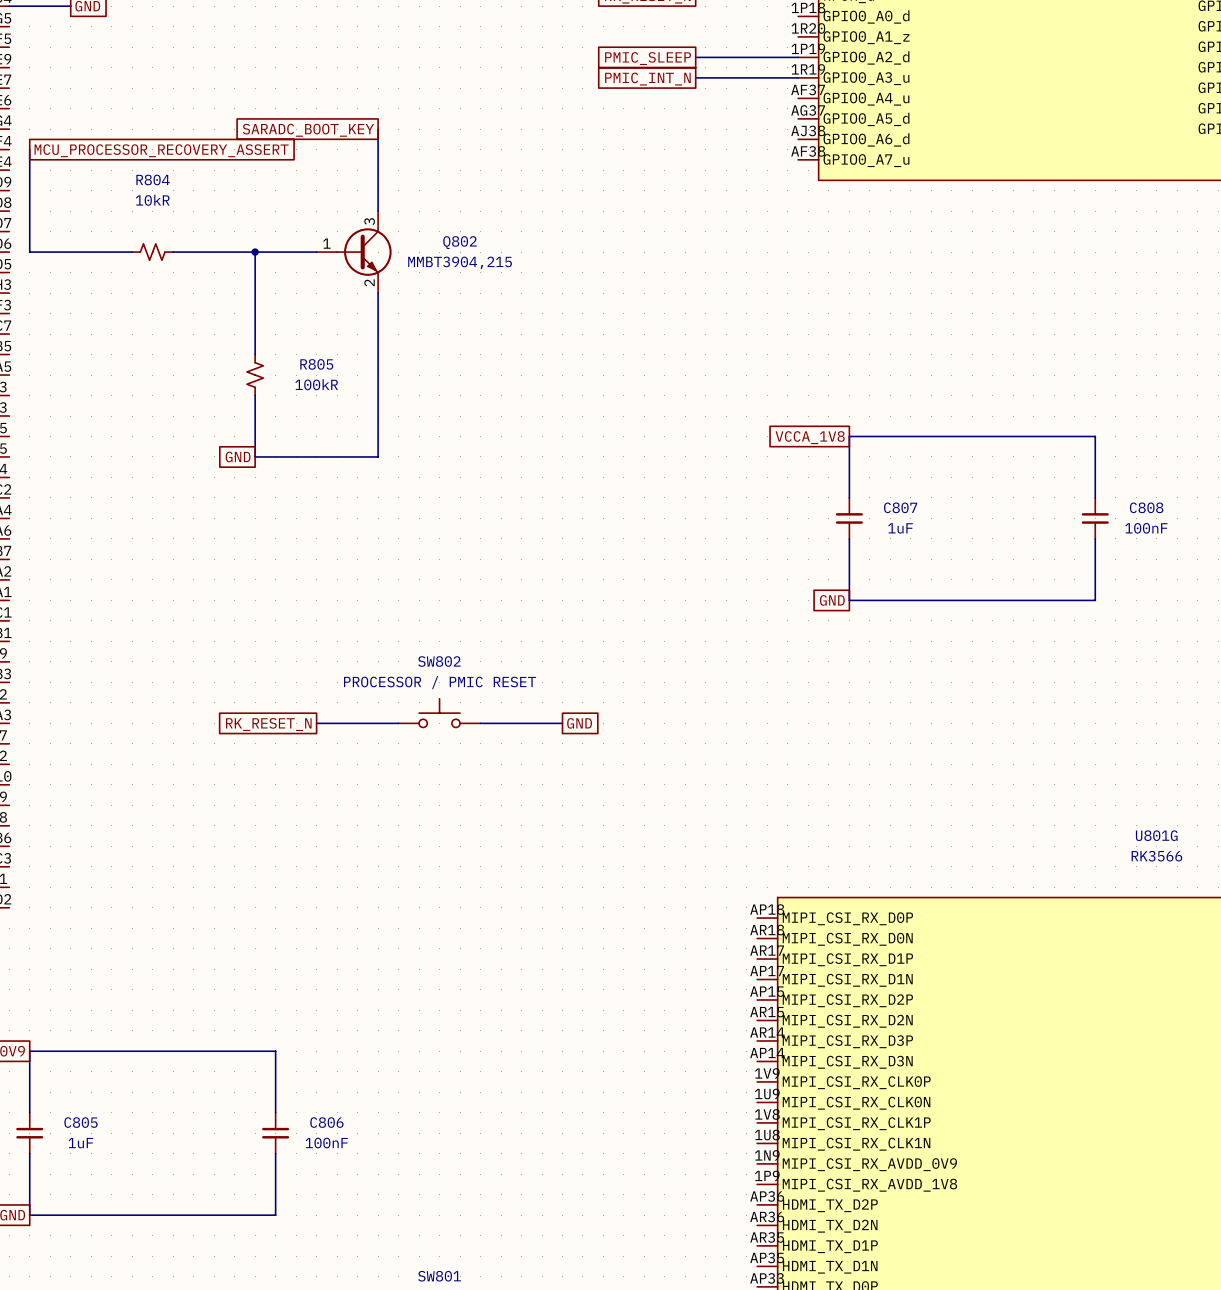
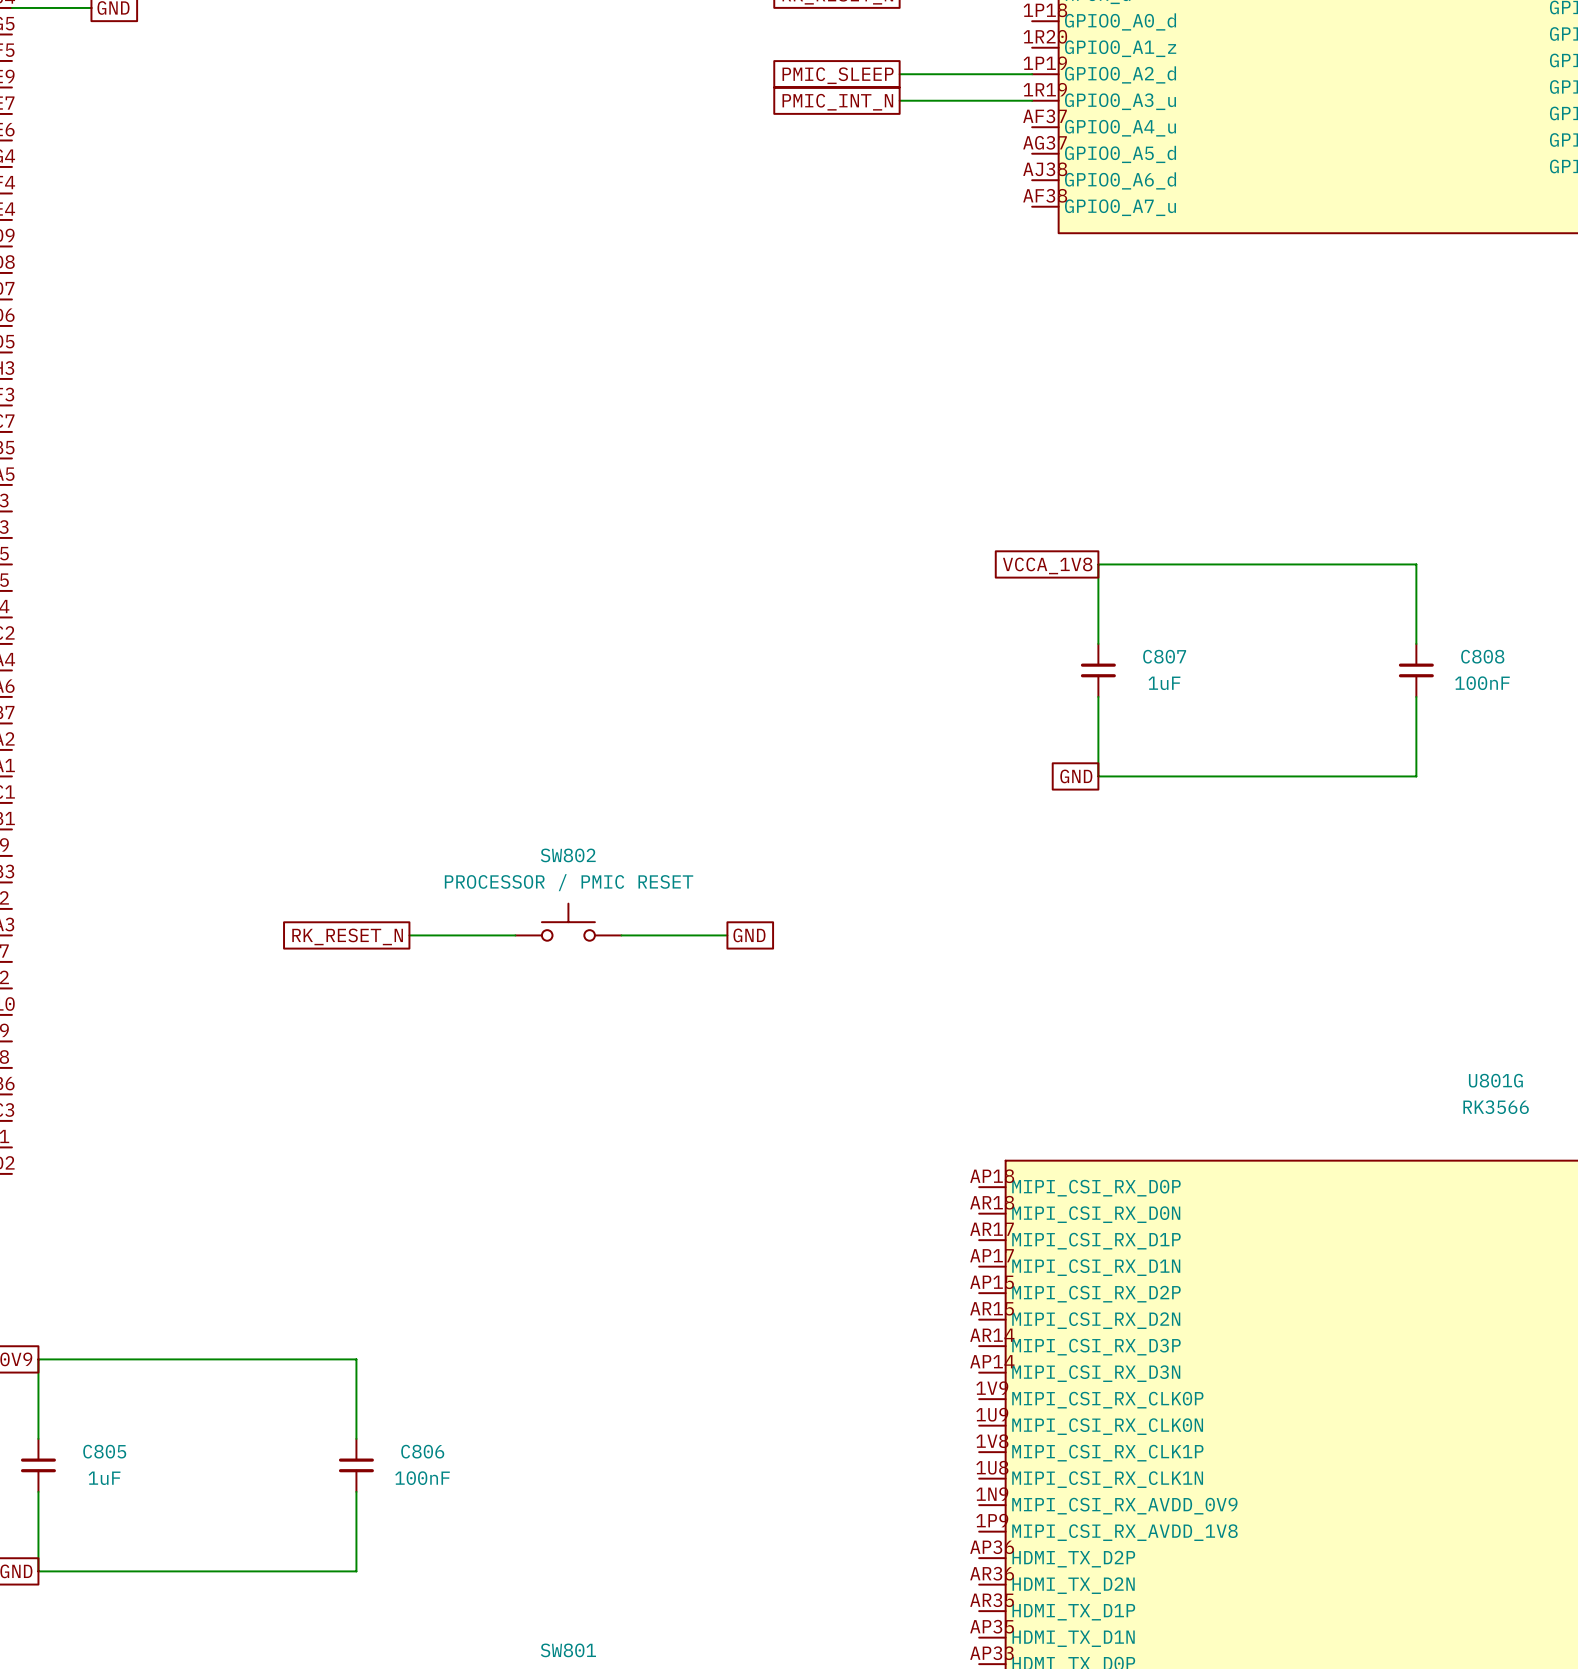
wire: (378, 129) (378, 211) -> none
global label: SARADC_BOOT_KEY (308, 130) -> none
wire: (29, 149) (29, 252) (132, 252) -> none
global label: MCU_PROCESSOR_RECOVERY_ASSERT (161, 150) -> none
R804: 10kR (152, 252) -> none
wire: (173, 252) (316, 252) -> none
wire: (255, 252) (255, 354) -> none
junction: (255, 252) -> none
Q802: MMBT3904,215 (354, 252) -> none
wire: (378, 293) (378, 456) (255, 456) (255, 395) -> none
R805: 100kR (255, 375) -> none
global label: GND (238, 456) -> none

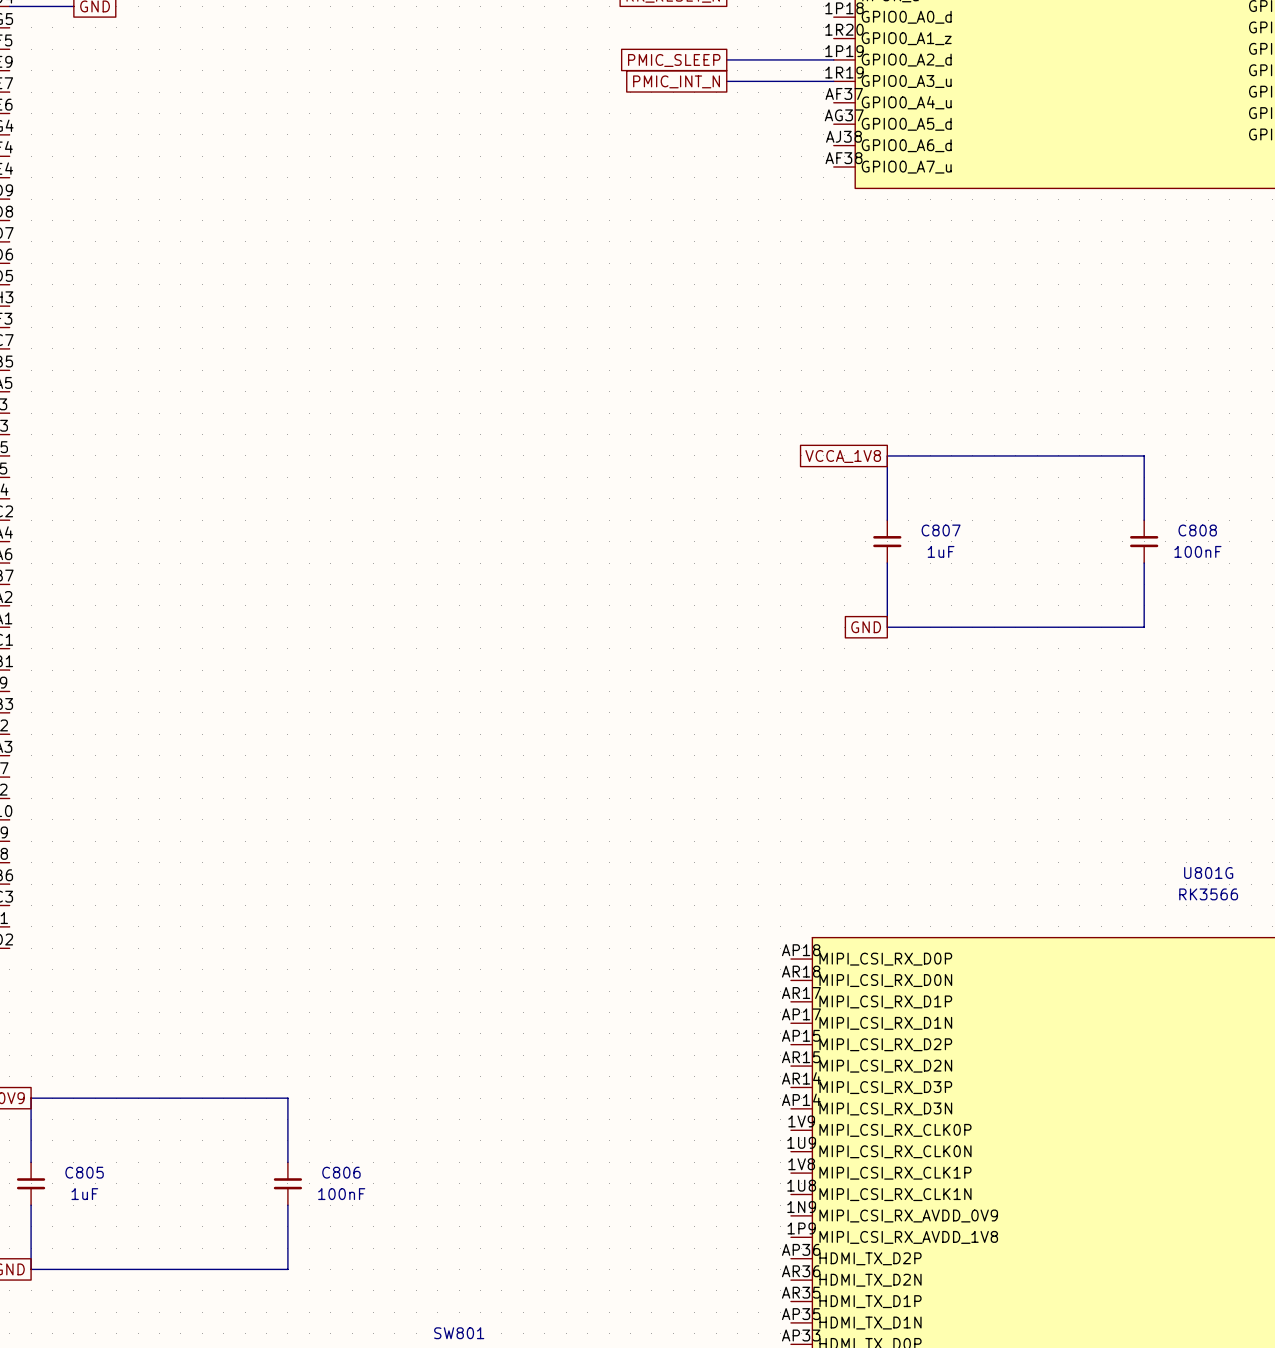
SW802: PROCESSOR / PMIC RESET (568, 922) -> none
wire: (409, 935) (515, 935) -> none
wire: (621, 935) (727, 935) -> none
global label: GND (749, 935) -> none
global label: RK_RESET_N (347, 936) -> none

